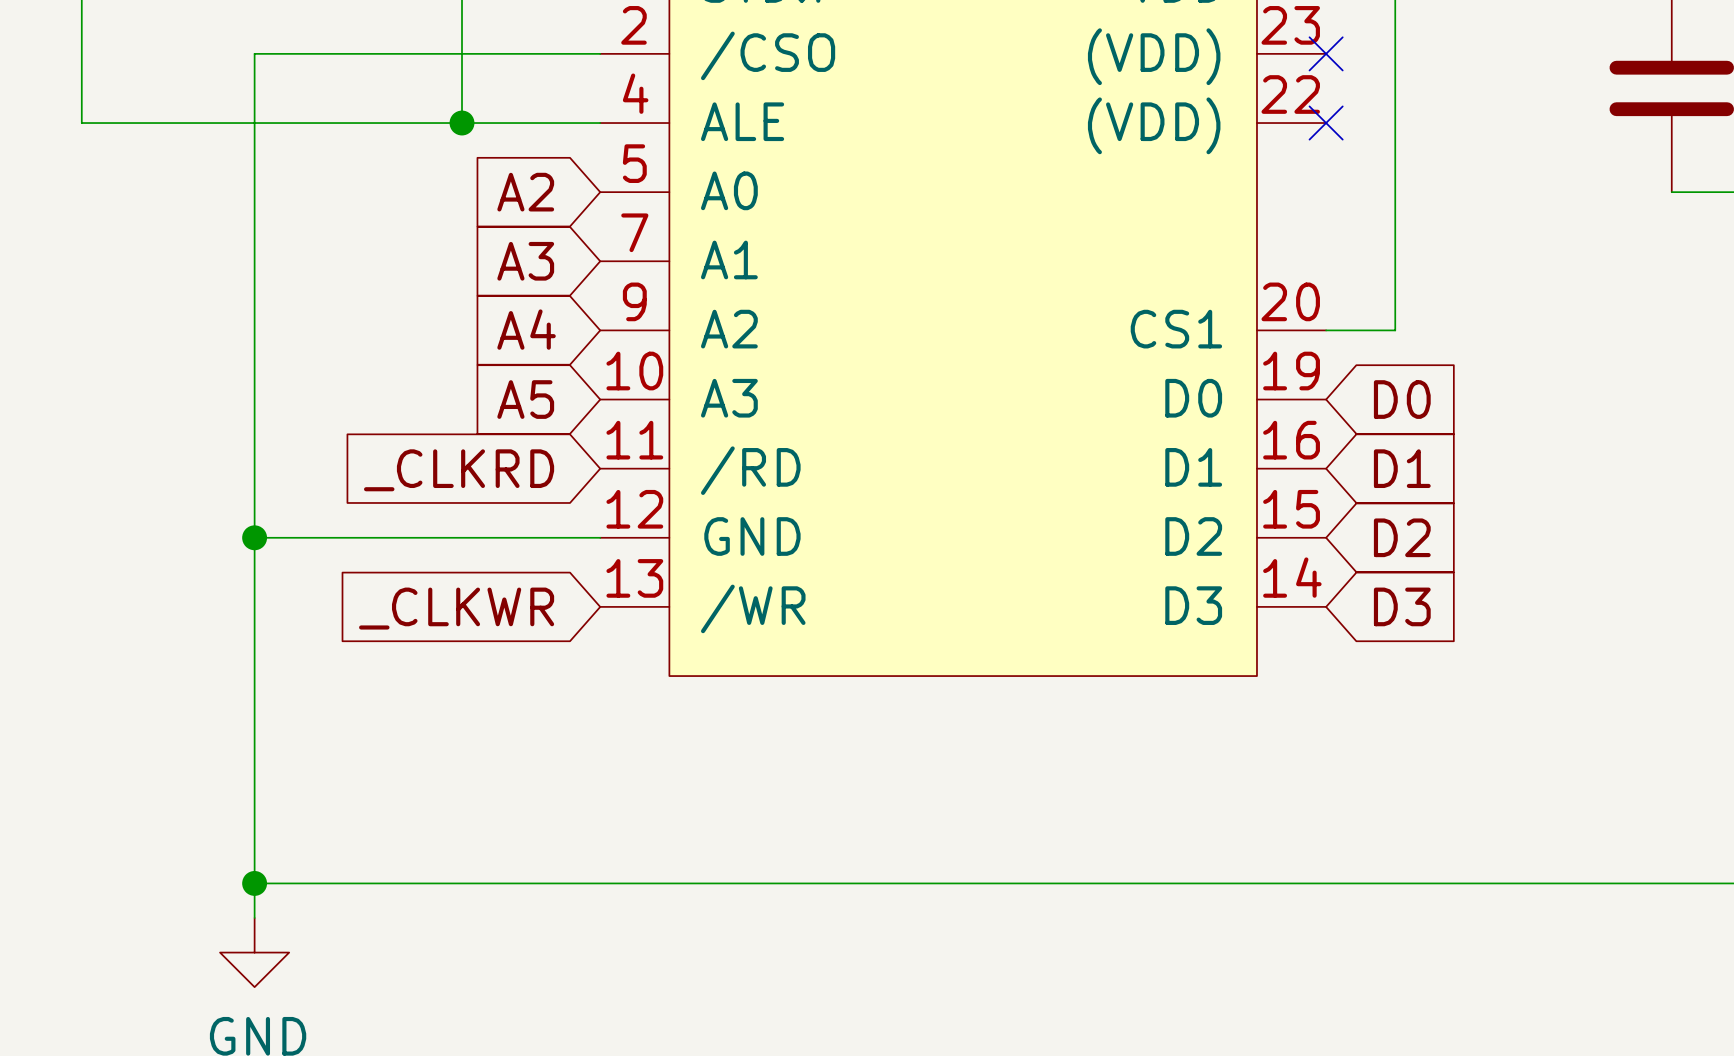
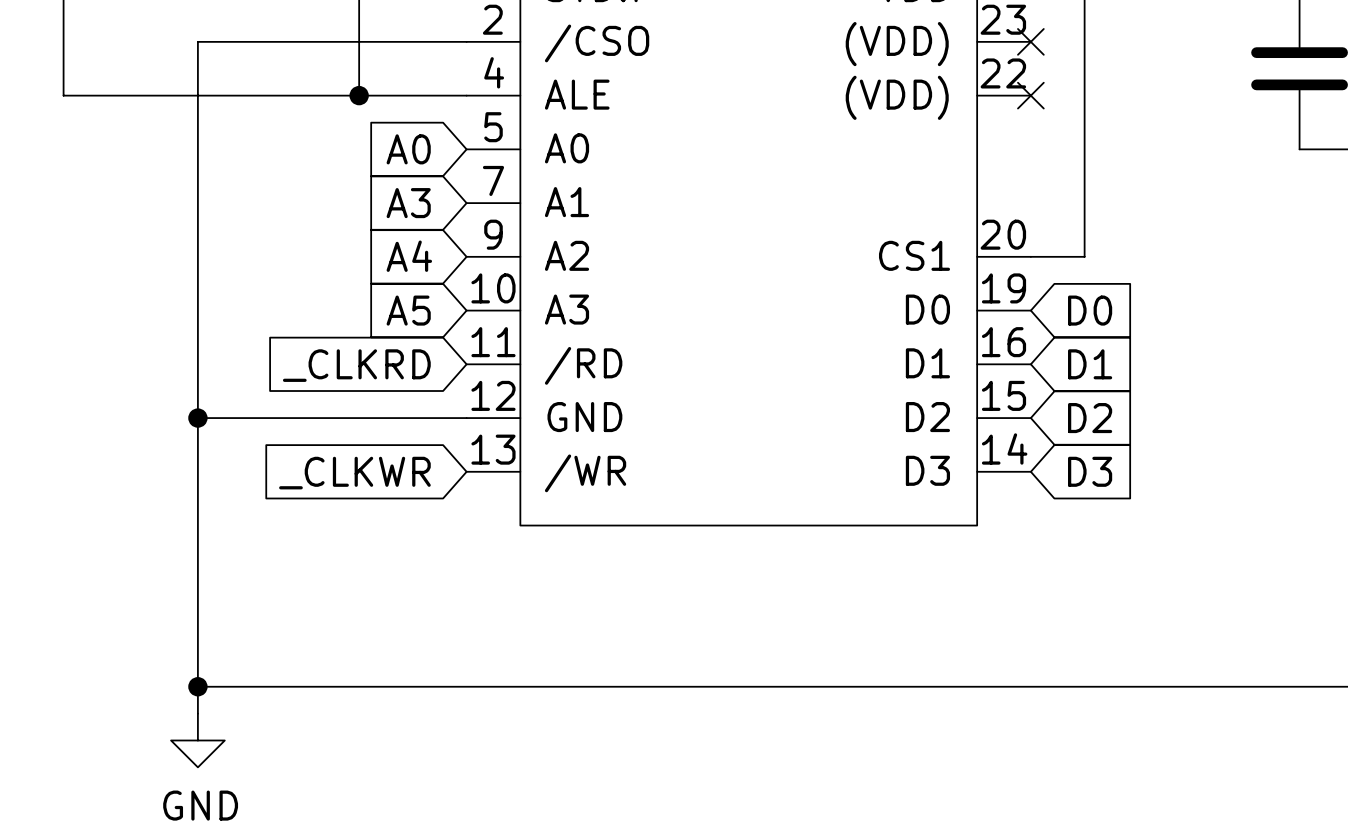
global label: A2 (525, 192) -> A0 (408, 149)

